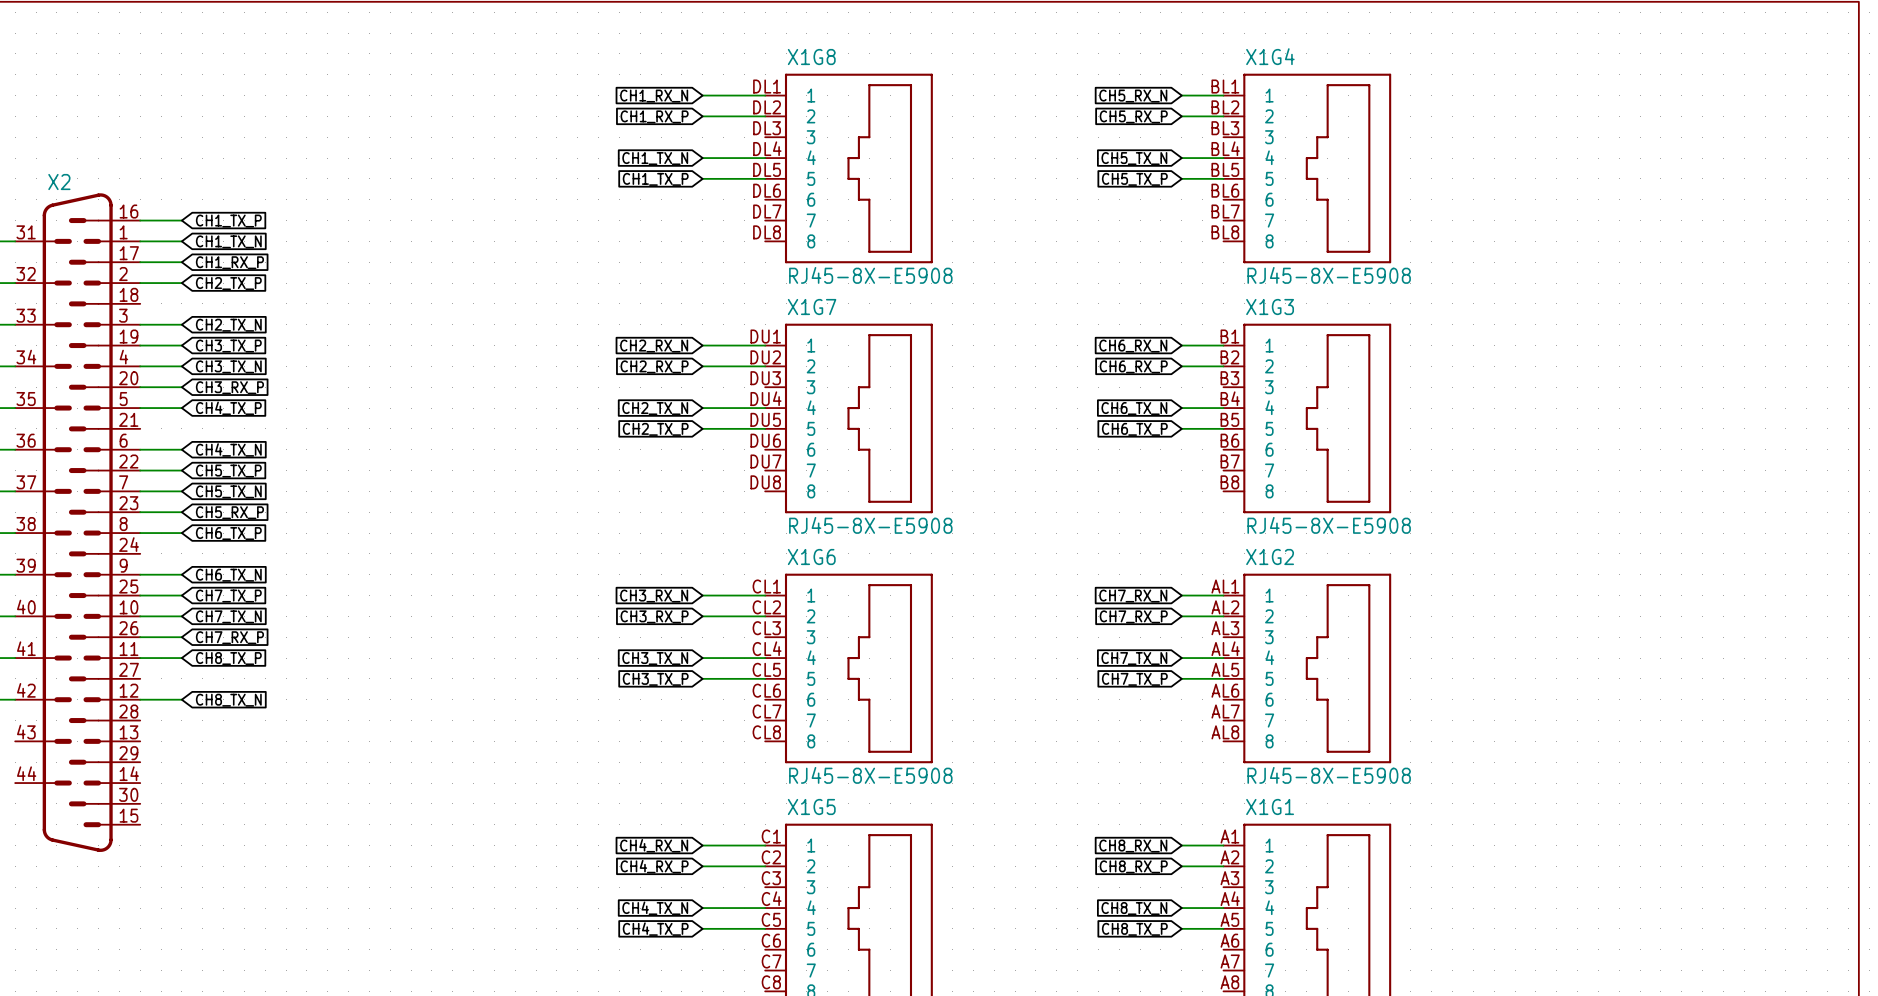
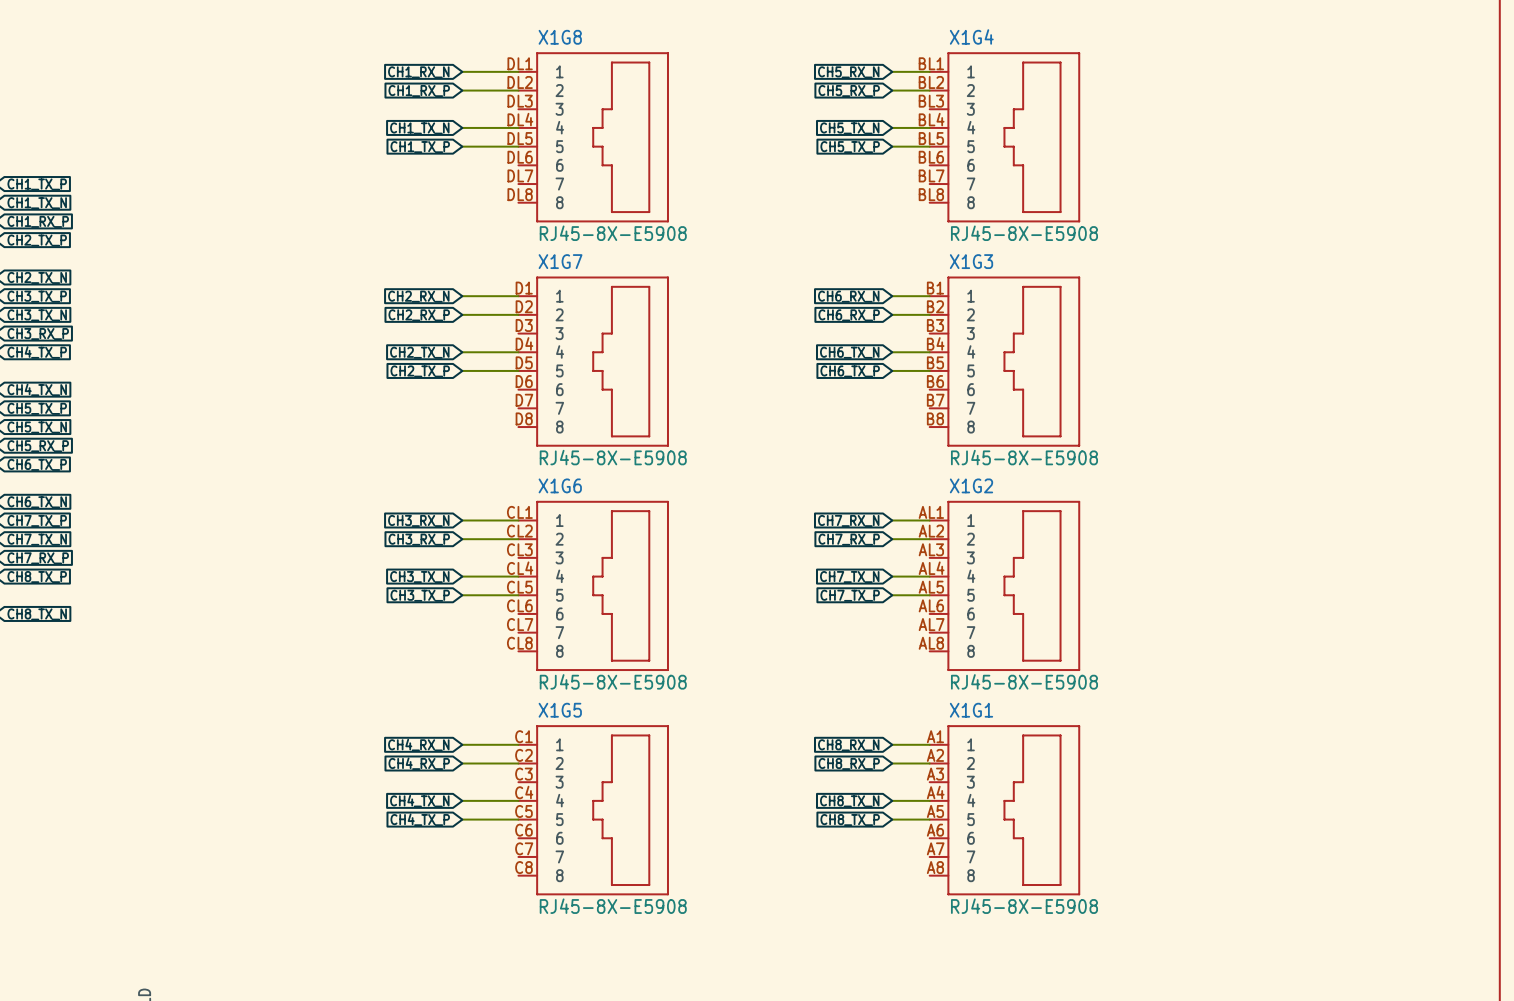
X1G7 pin number: DU1 (765, 336) -> D1 (524, 288)
X1G7 pin number: DU2 (765, 357) -> D2 (524, 306)
X1G7 pin number: DU3 (765, 378) -> D3 (524, 325)
X1G7 pin number: DU4 (765, 398) -> D4 (524, 343)
X1G7 pin number: DU5 (765, 419) -> D5 (524, 362)
X1G7 pin number: DU6 (765, 440) -> D6 (524, 381)
X1G7 pin number: DU7 (765, 461) -> D7 (524, 400)
X1G7 pin number: DU8 (765, 482) -> D8 (524, 418)

